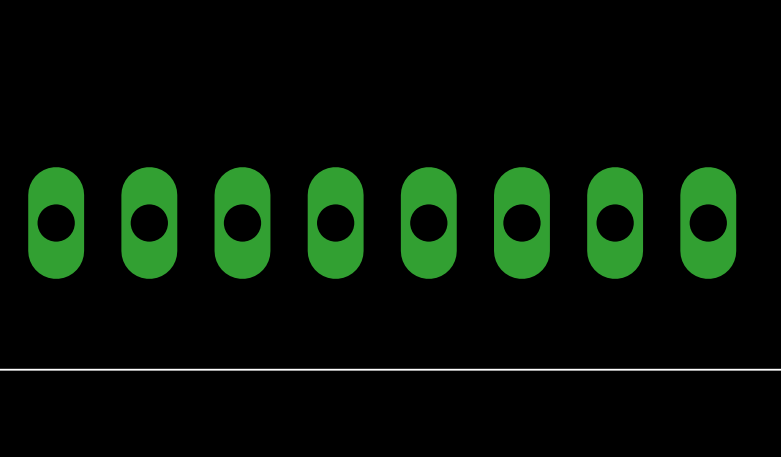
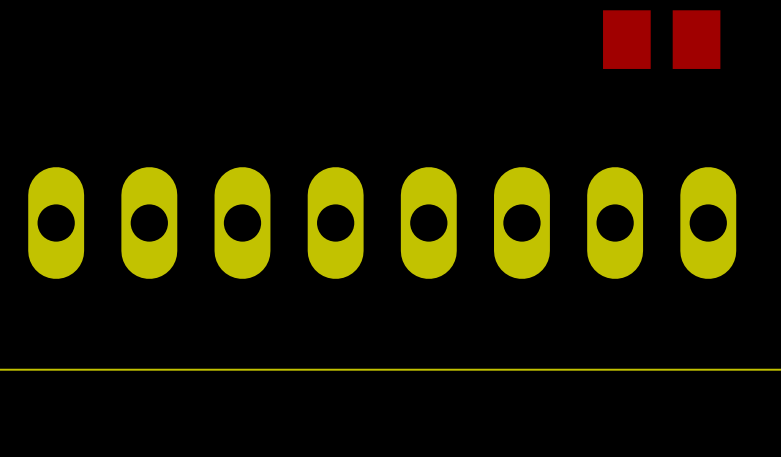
part: none -> (661, 39)

